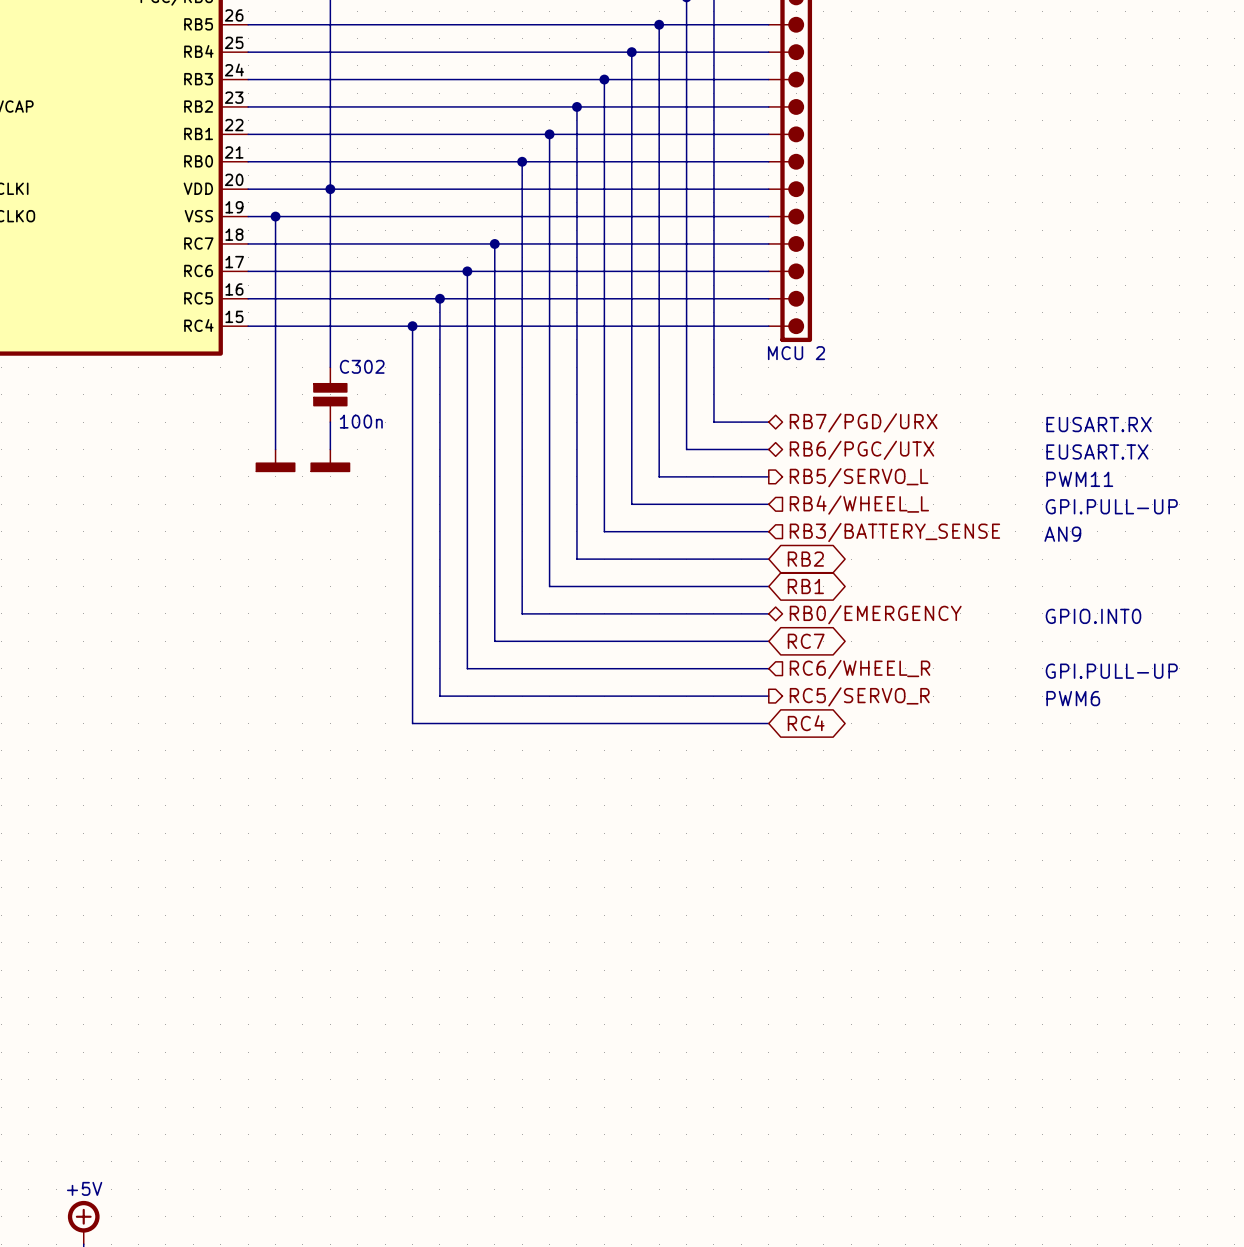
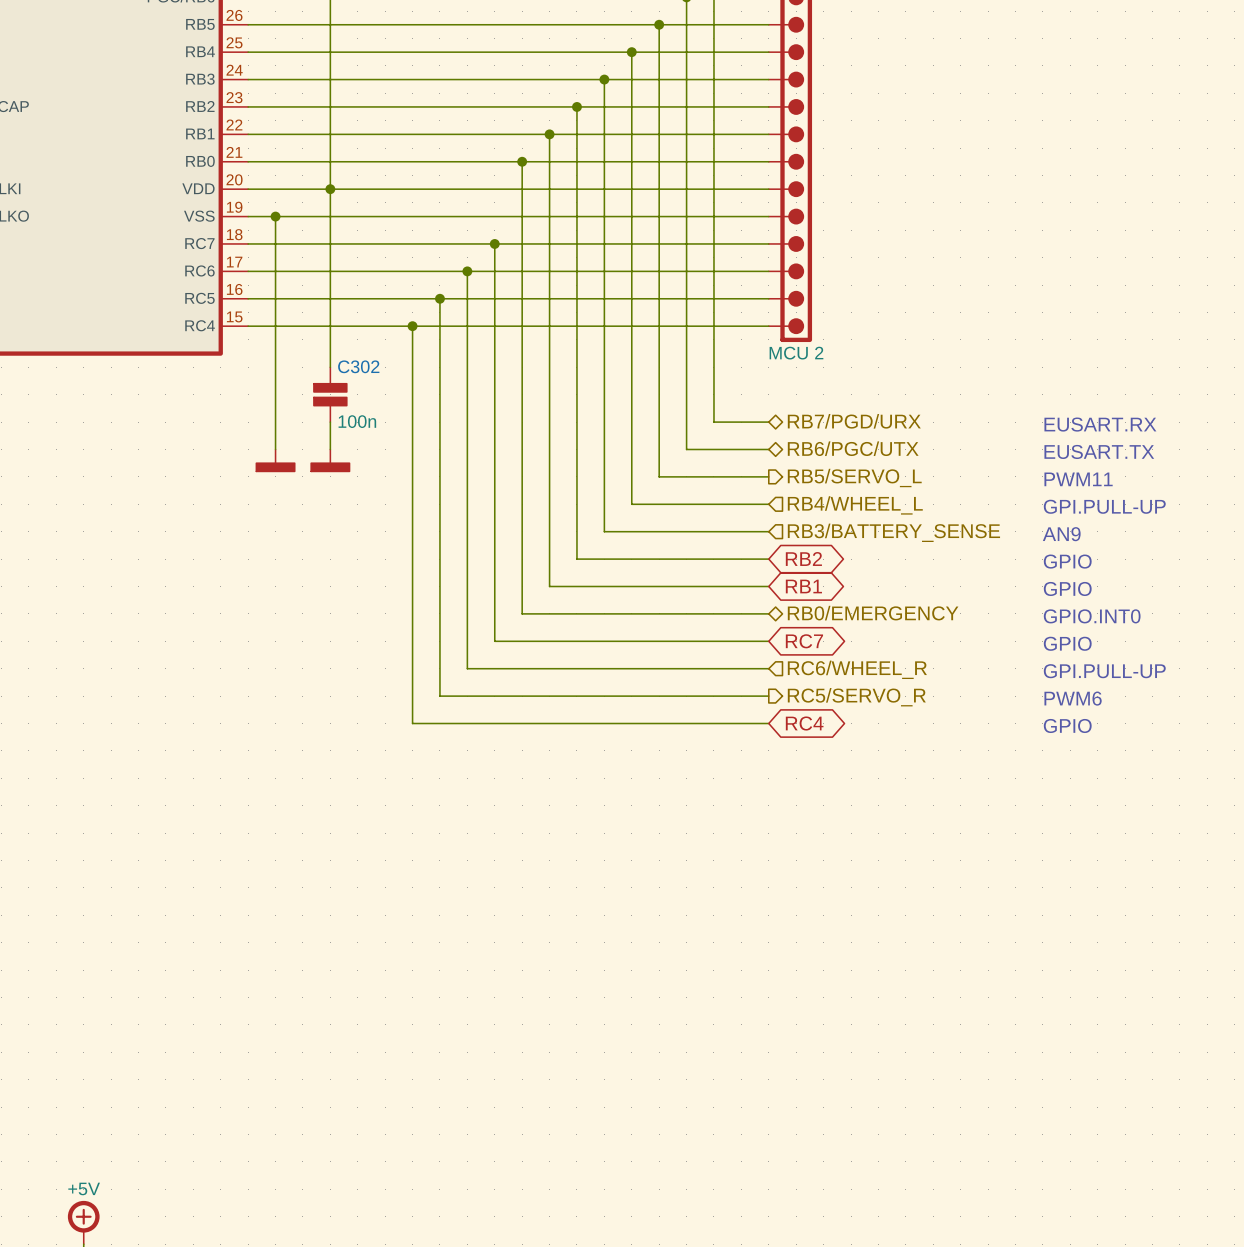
text: none -> GPIO (1067, 561)
text: none -> GPIO (1067, 588)
text: none -> GPIO (1067, 643)
text: none -> GPIO (1067, 725)

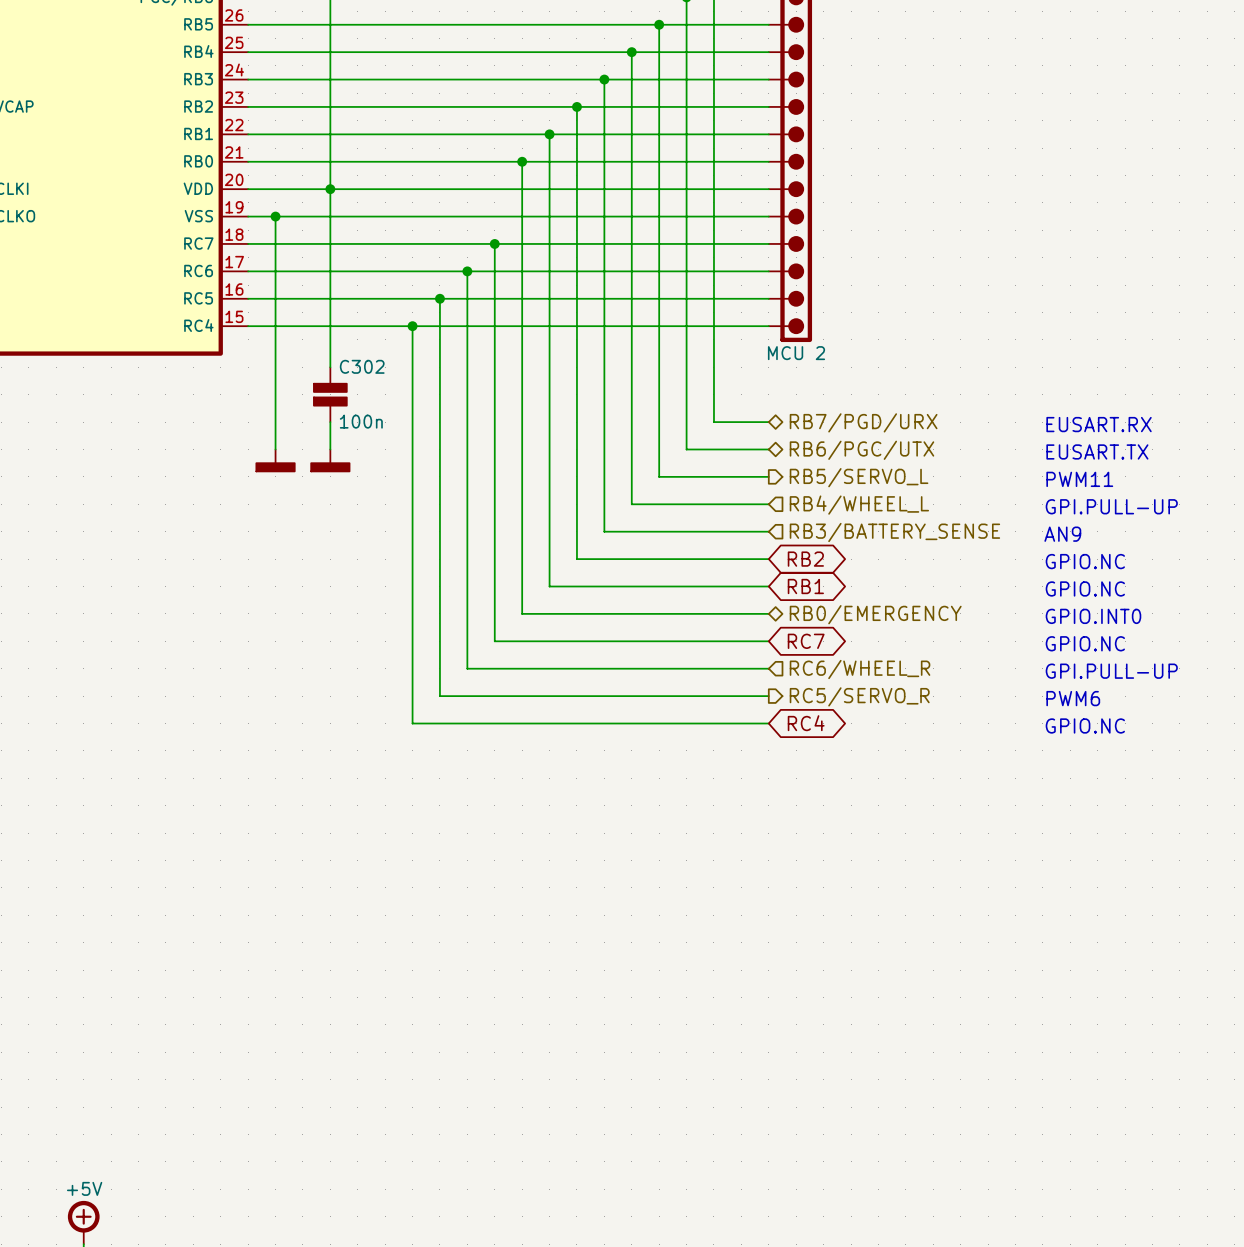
text: GPIO (1067, 561) -> GPIO.NC (1085, 561)
text: GPIO (1067, 588) -> GPIO.NC (1085, 588)
text: GPIO (1067, 643) -> GPIO.NC (1085, 643)
text: GPIO (1067, 725) -> GPIO.NC (1085, 725)

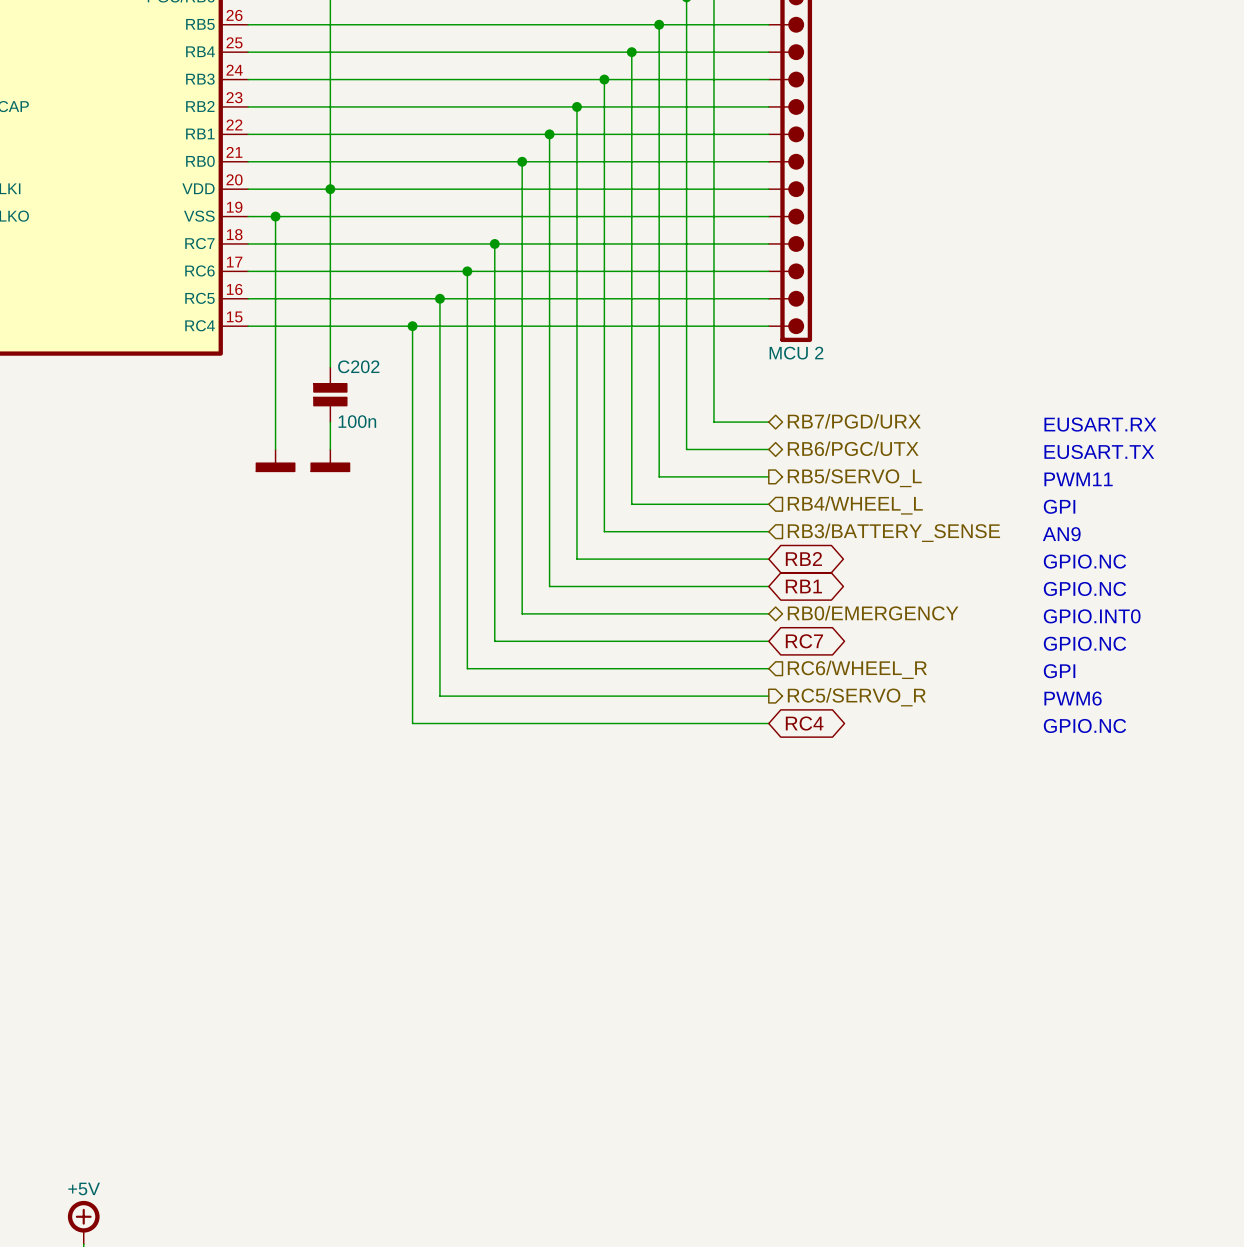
C302 name: C302 (362, 366) -> C202 (358, 366)
text: GPI.PULL-UP (1111, 506) -> GPI (1059, 506)
text: GPI.PULL-UP (1111, 671) -> GPI (1059, 671)

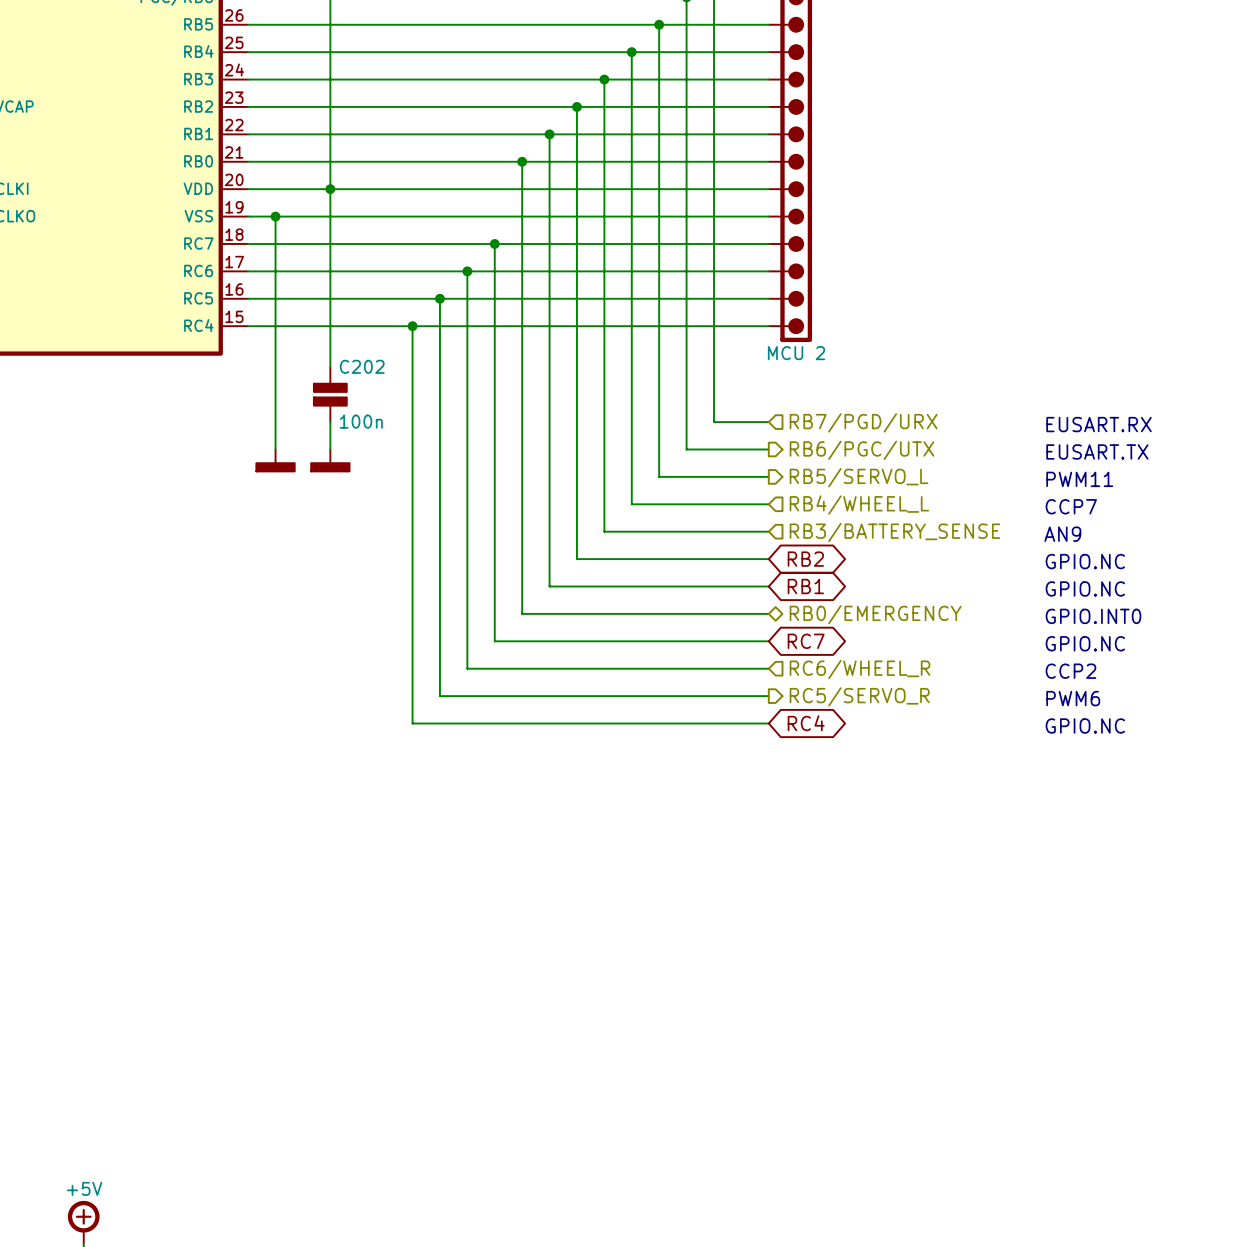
hierarchical label shape: bidirectional (854, 421) -> input (863, 422)
hierarchical label shape: bidirectional (853, 448) -> output (861, 450)
text: GPI (1059, 506) -> CCP7 (1071, 506)
text: GPI (1059, 671) -> CCP2 (1070, 671)

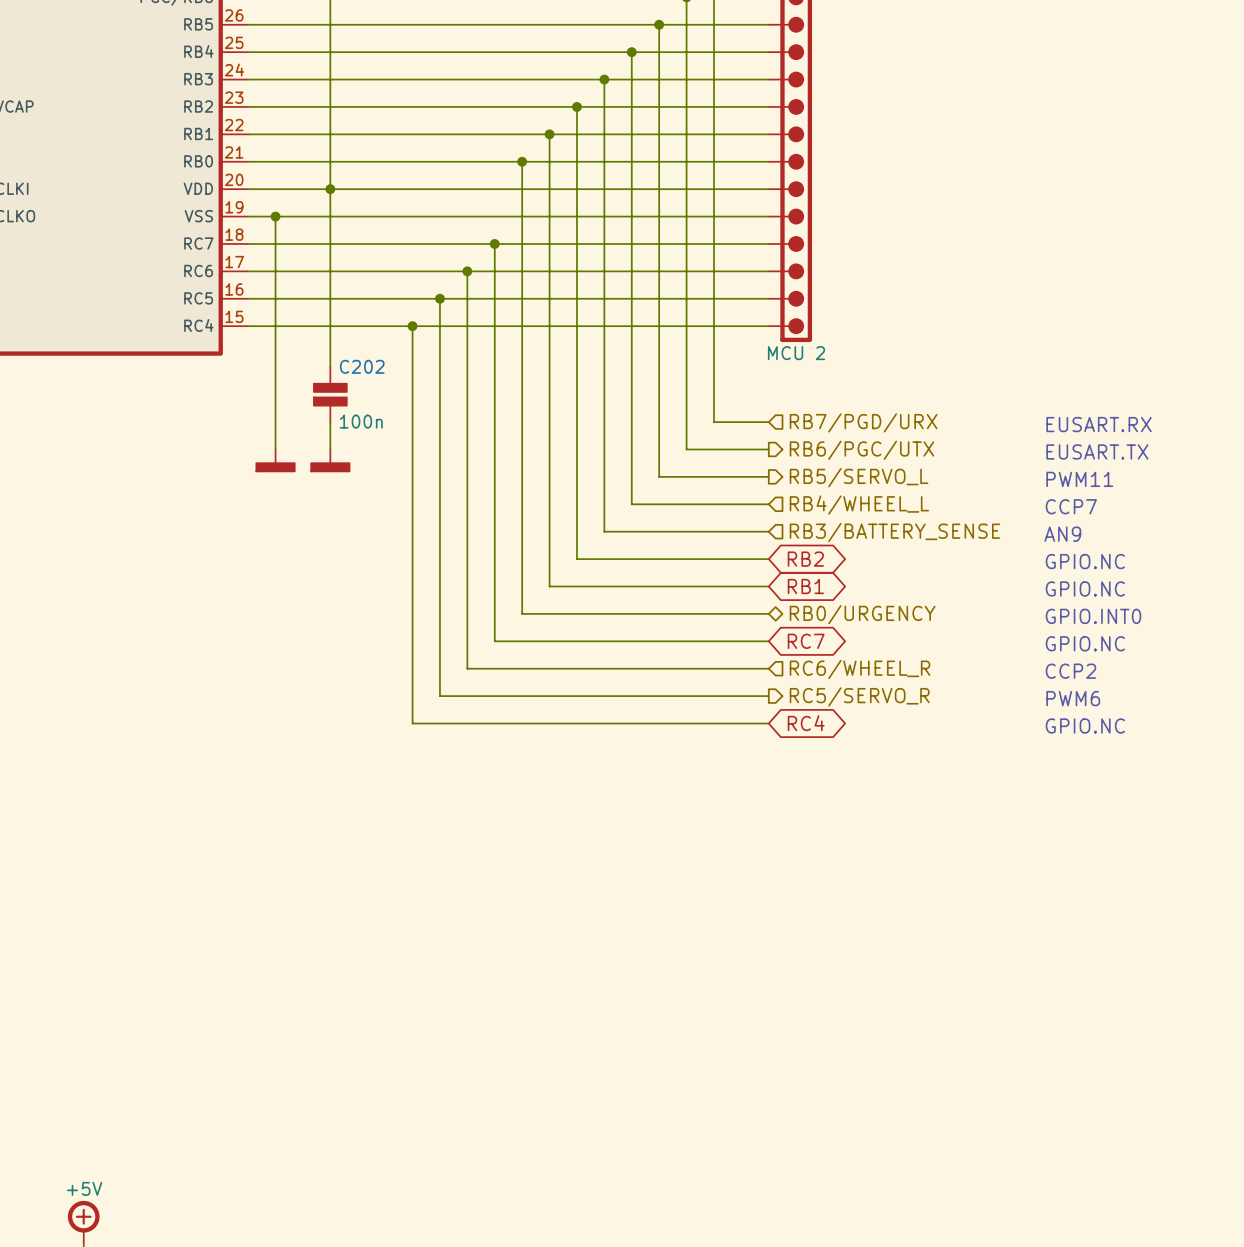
hierarchical label: RB0/EMERGENCY (875, 614) -> RB0/URGENCY (862, 614)

